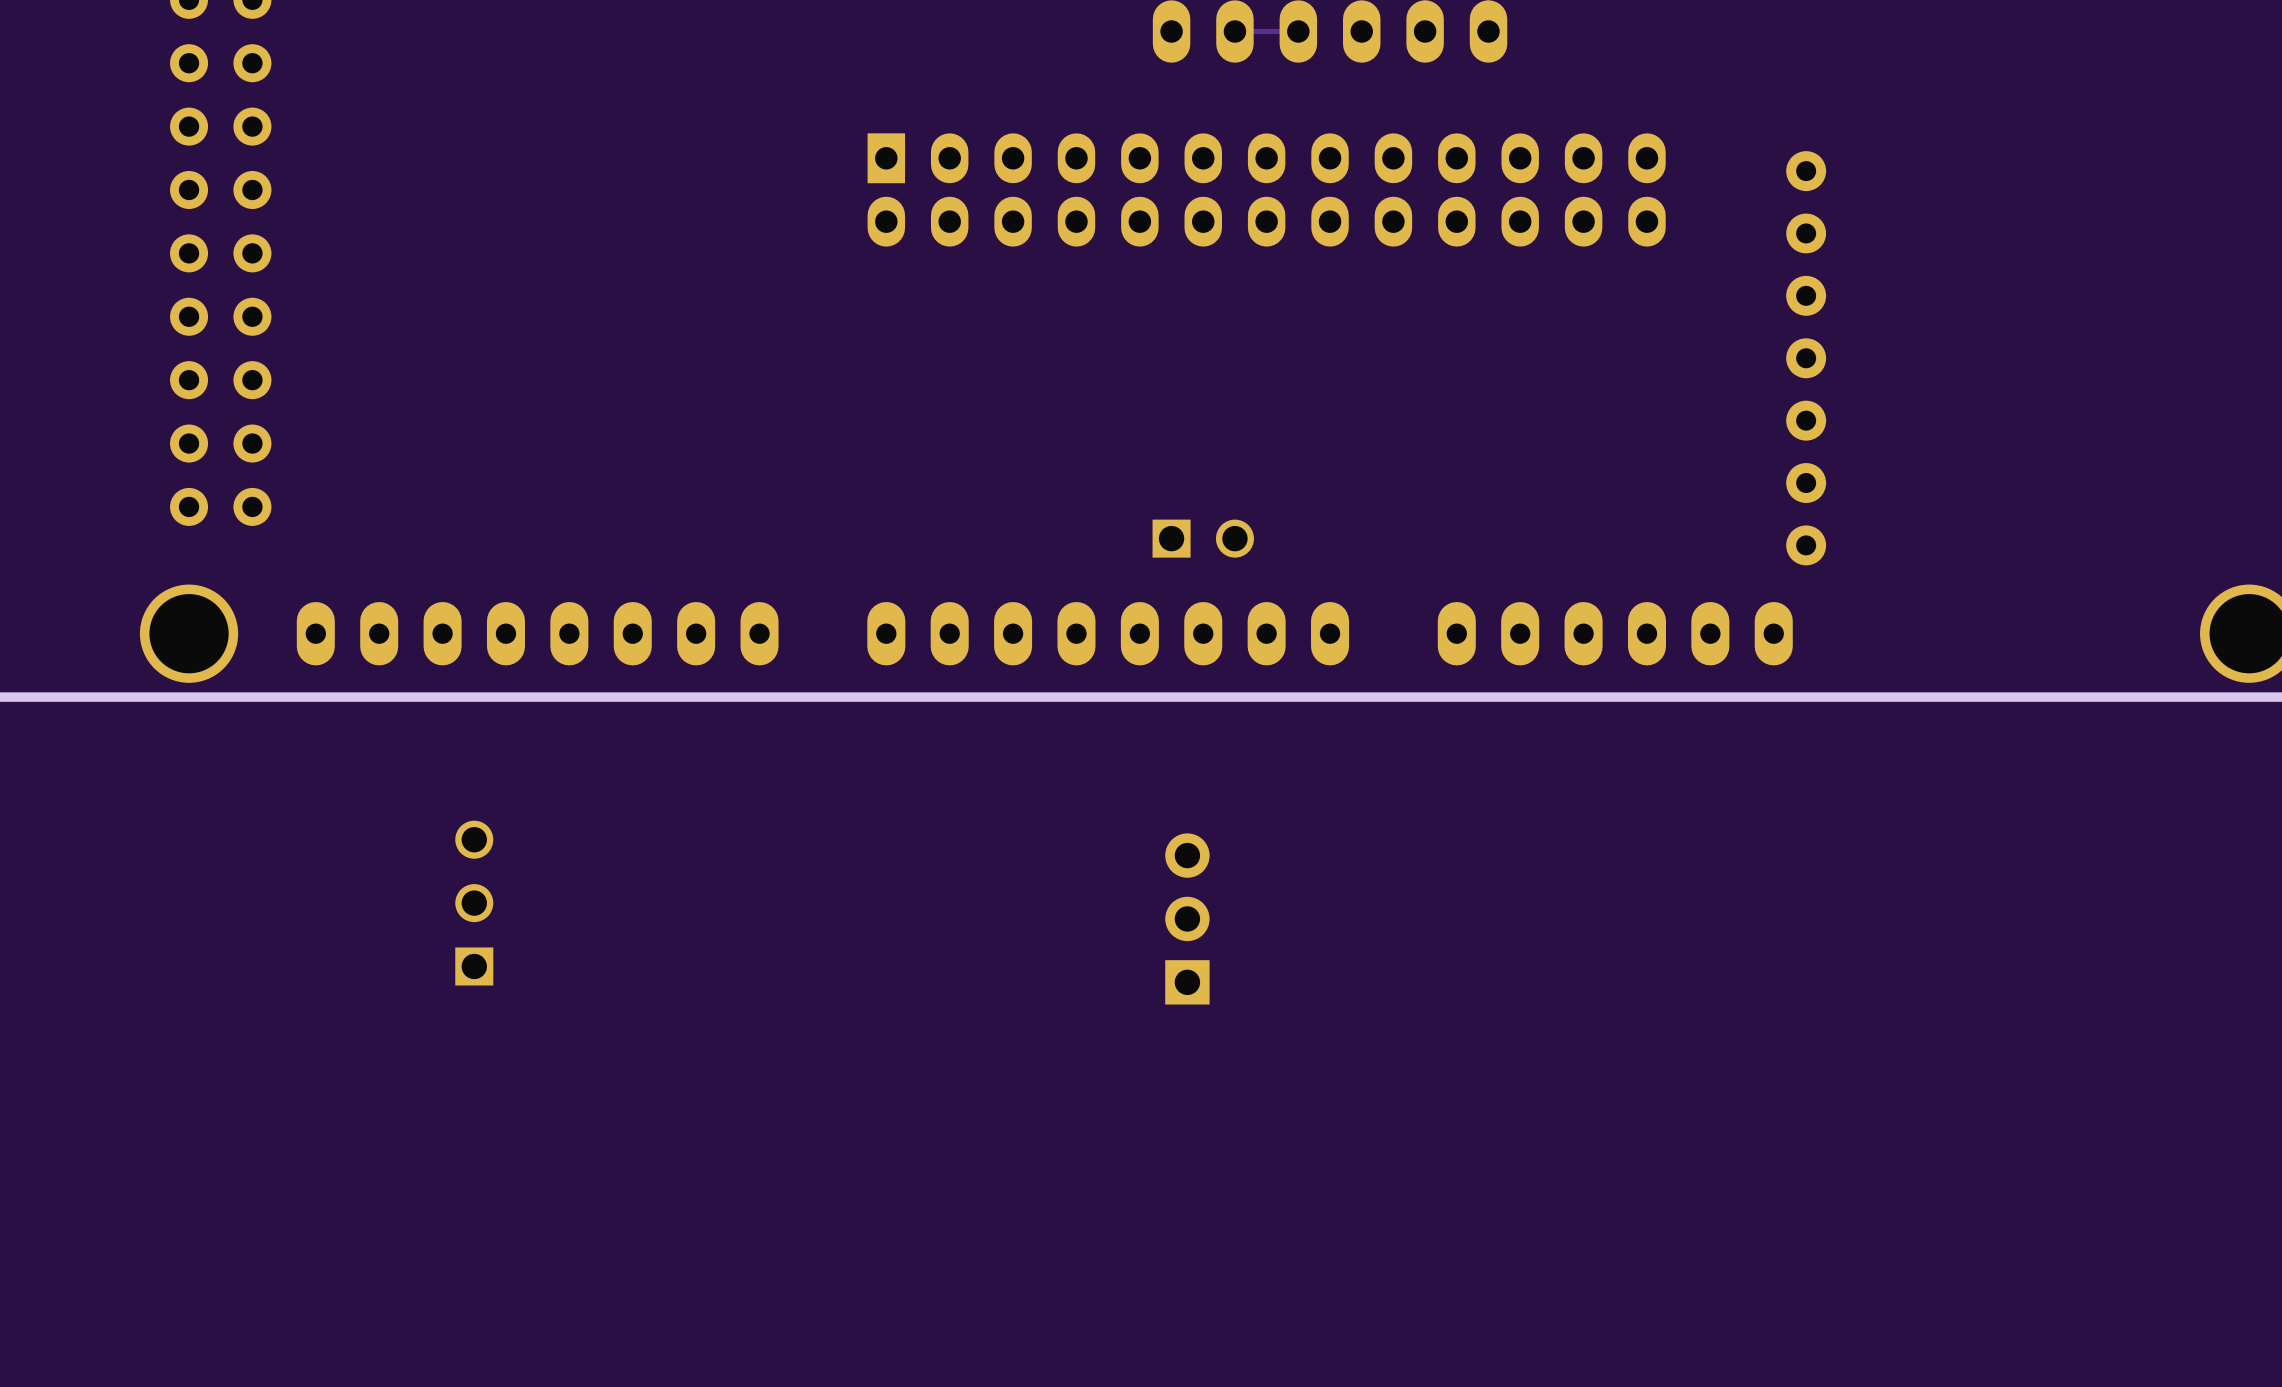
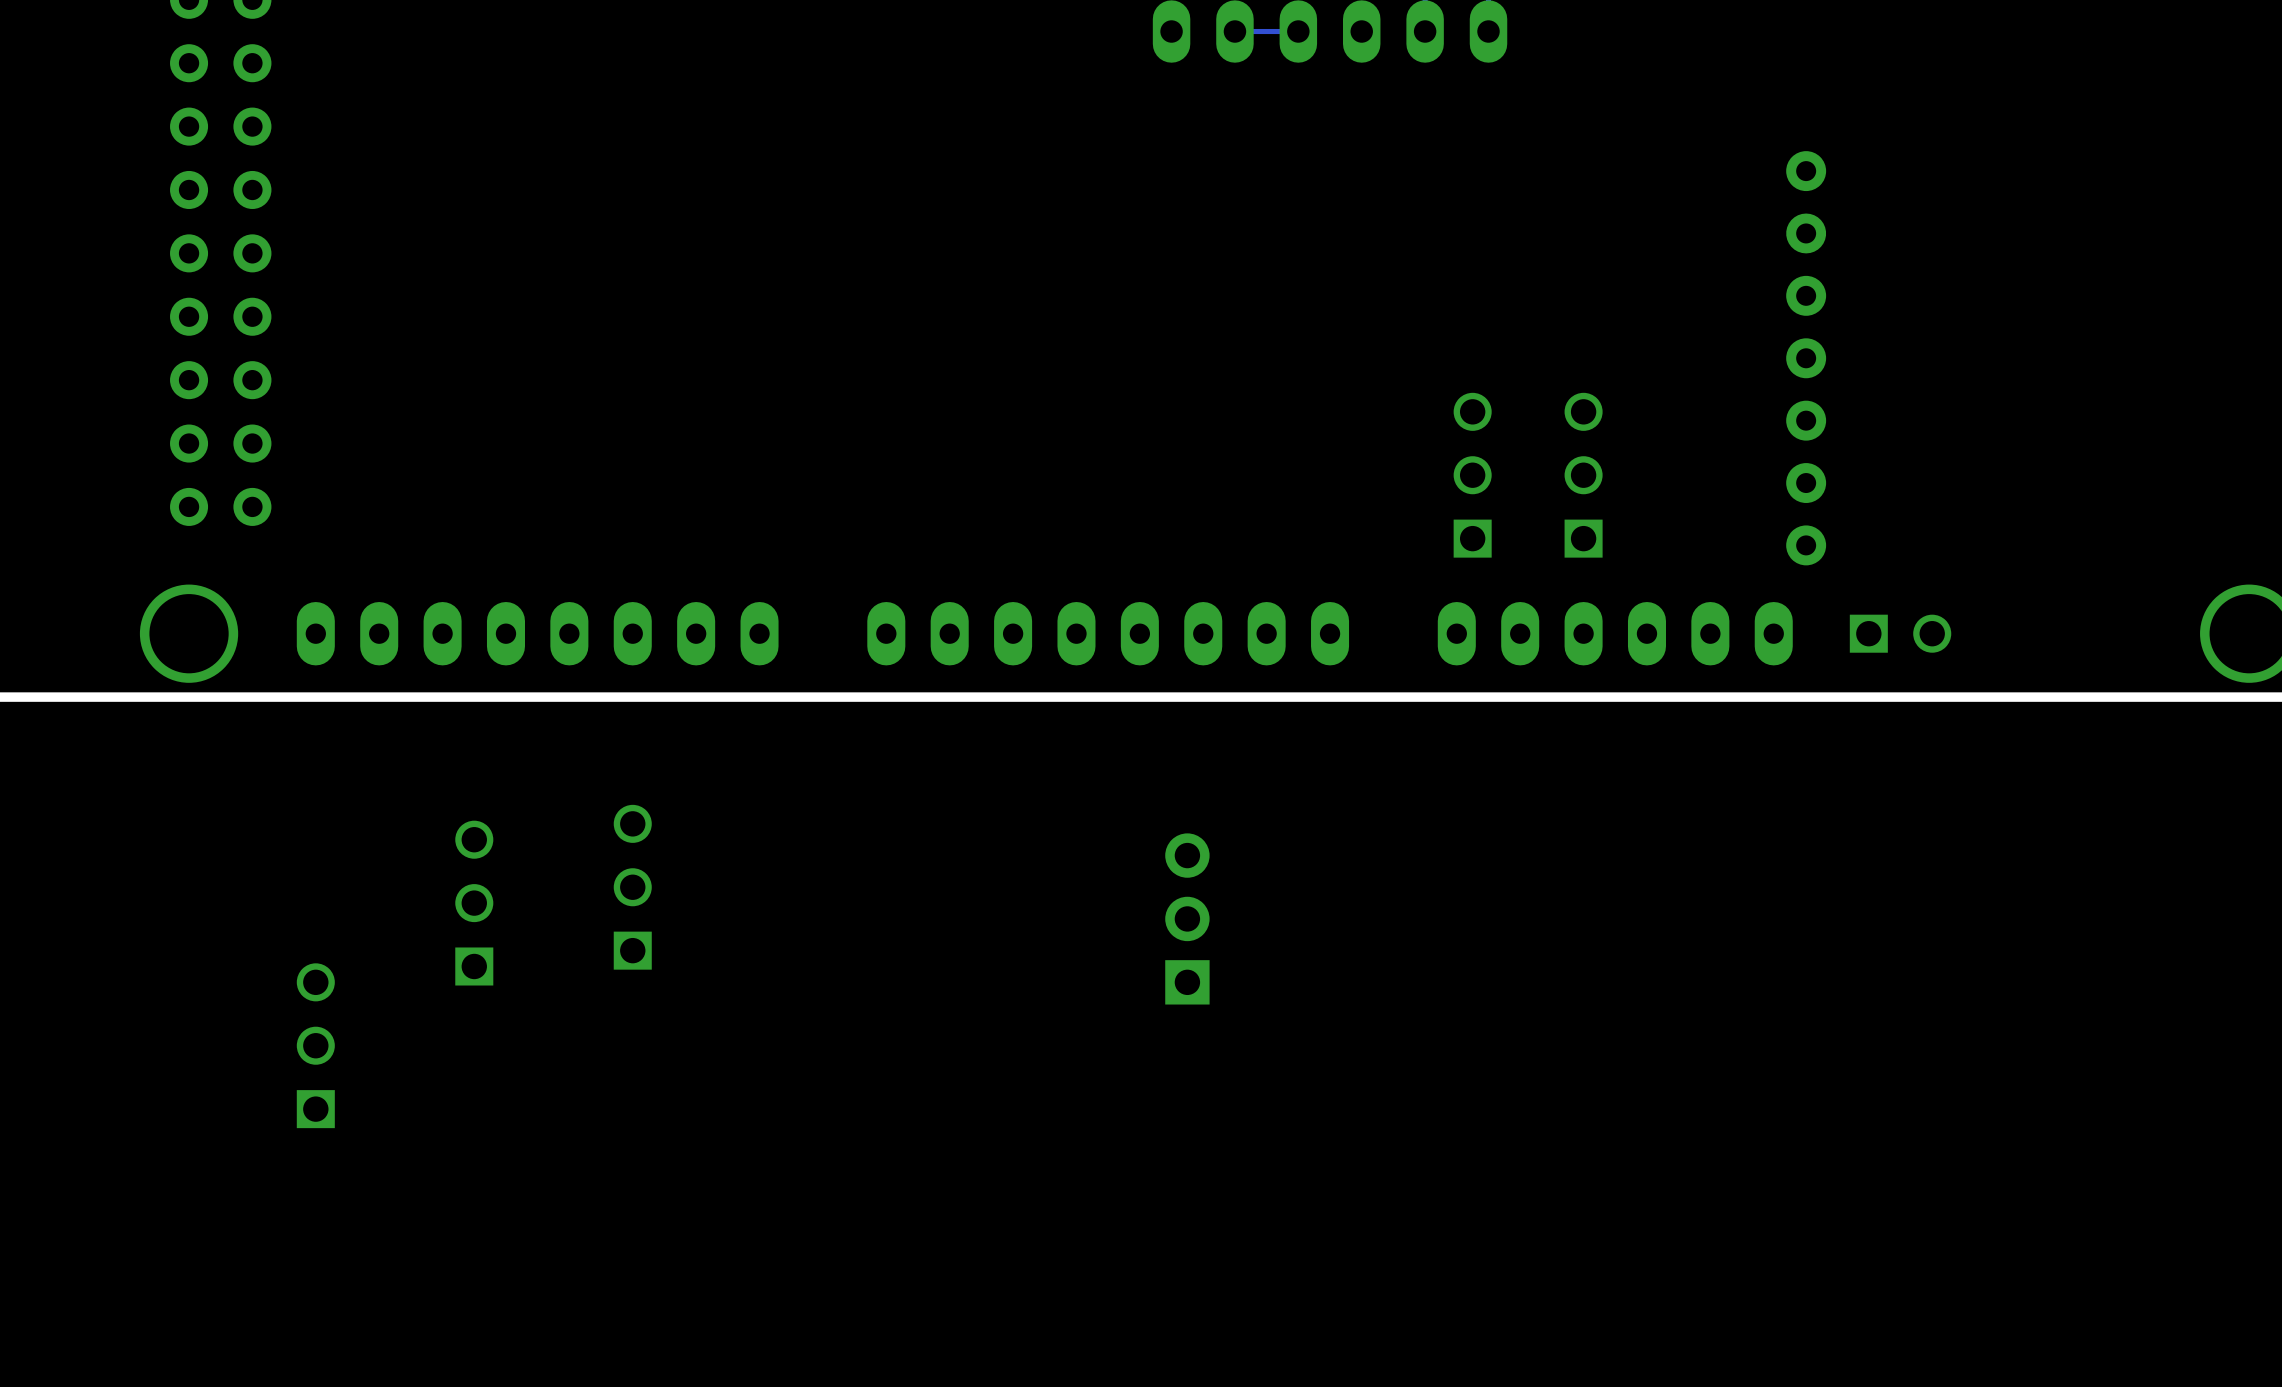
part: (1266, 189) -> none
part: none -> (1472, 475)
part: none -> (1583, 475)
part: (1203, 538) -> none
part: none -> (1900, 633)
part: none -> (632, 887)
part: none -> (315, 1045)

